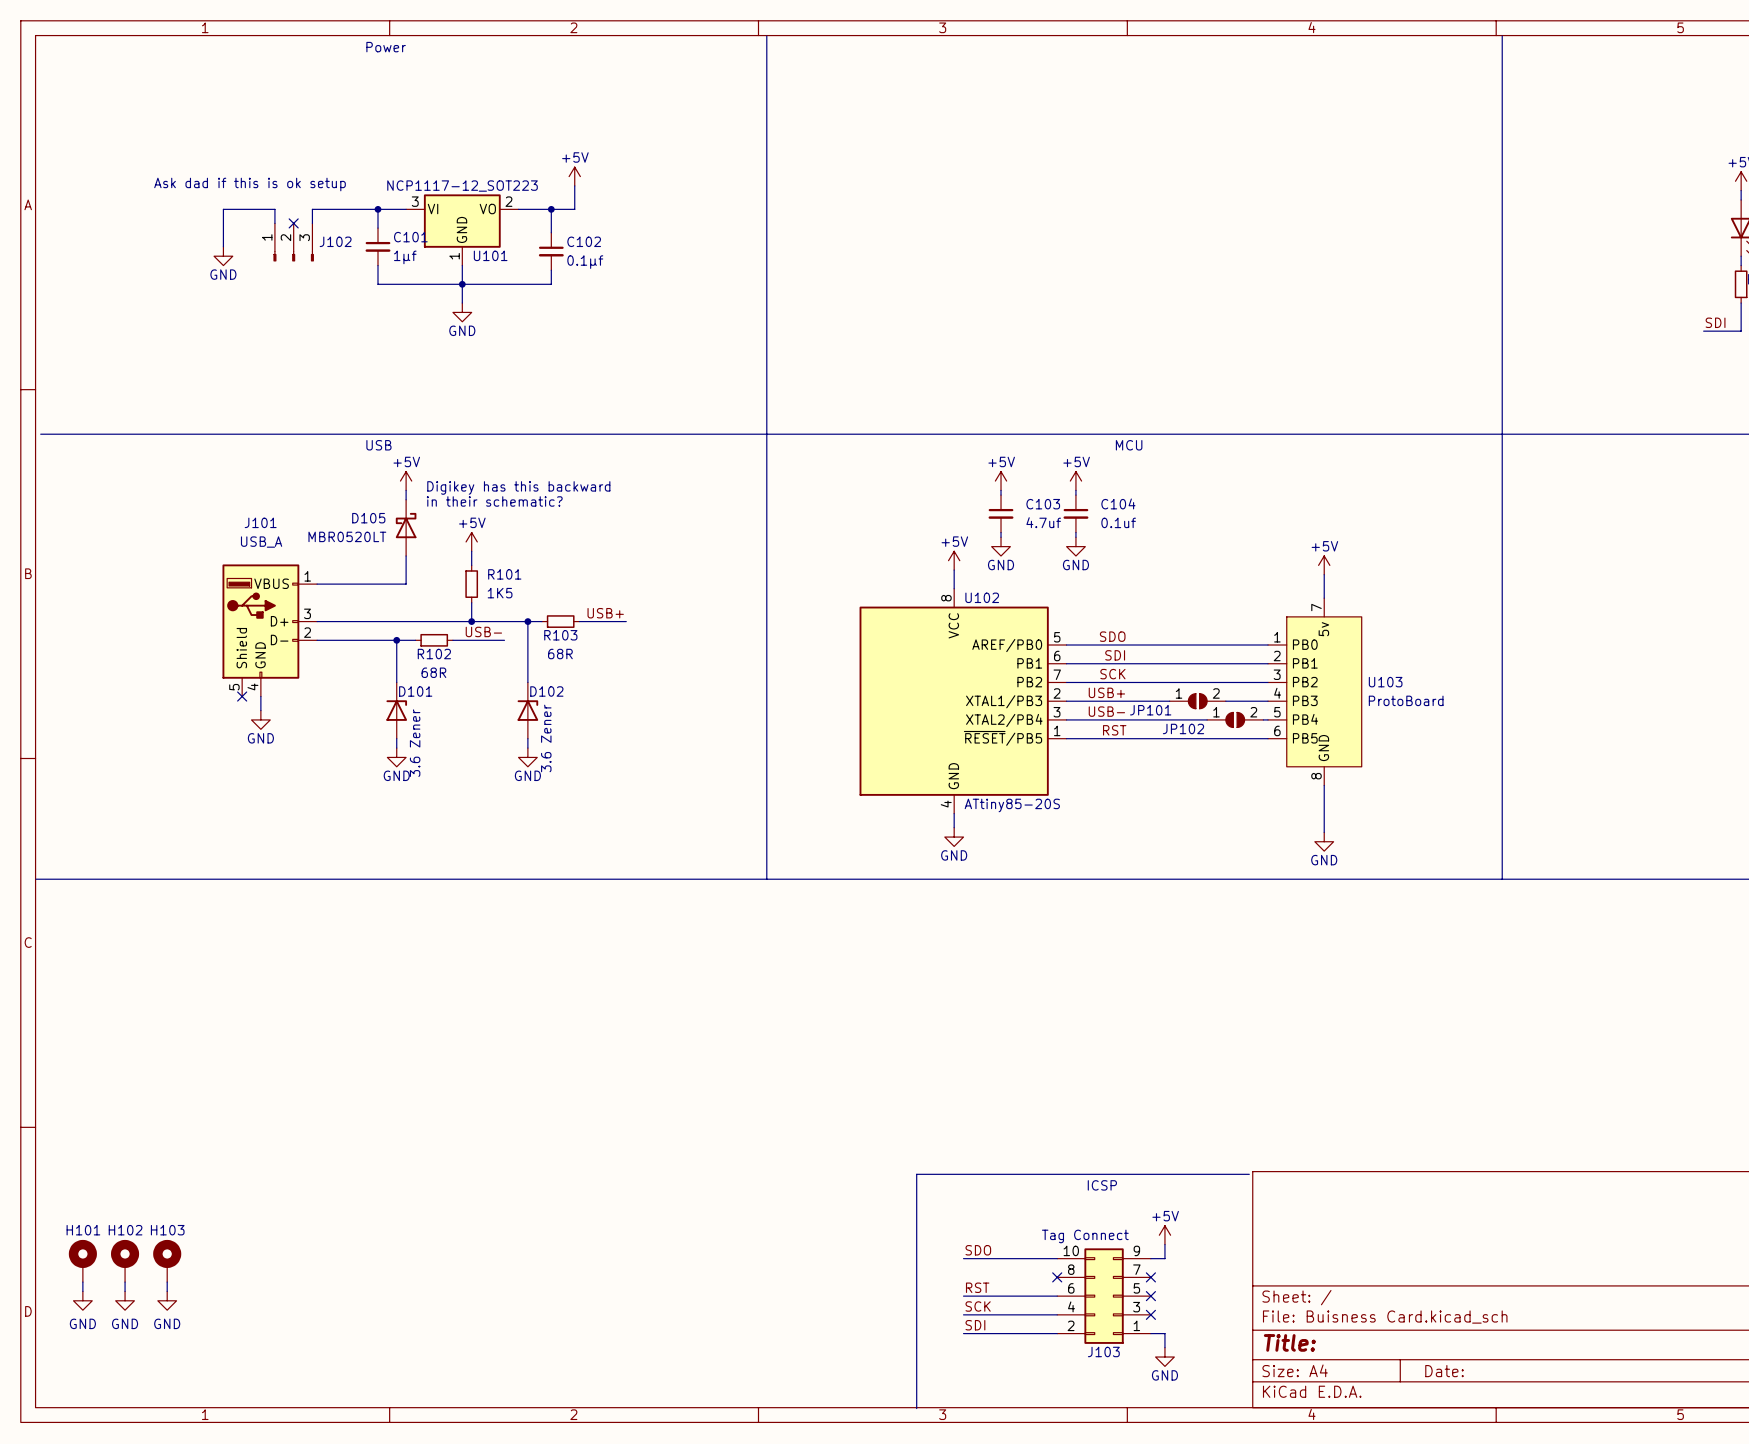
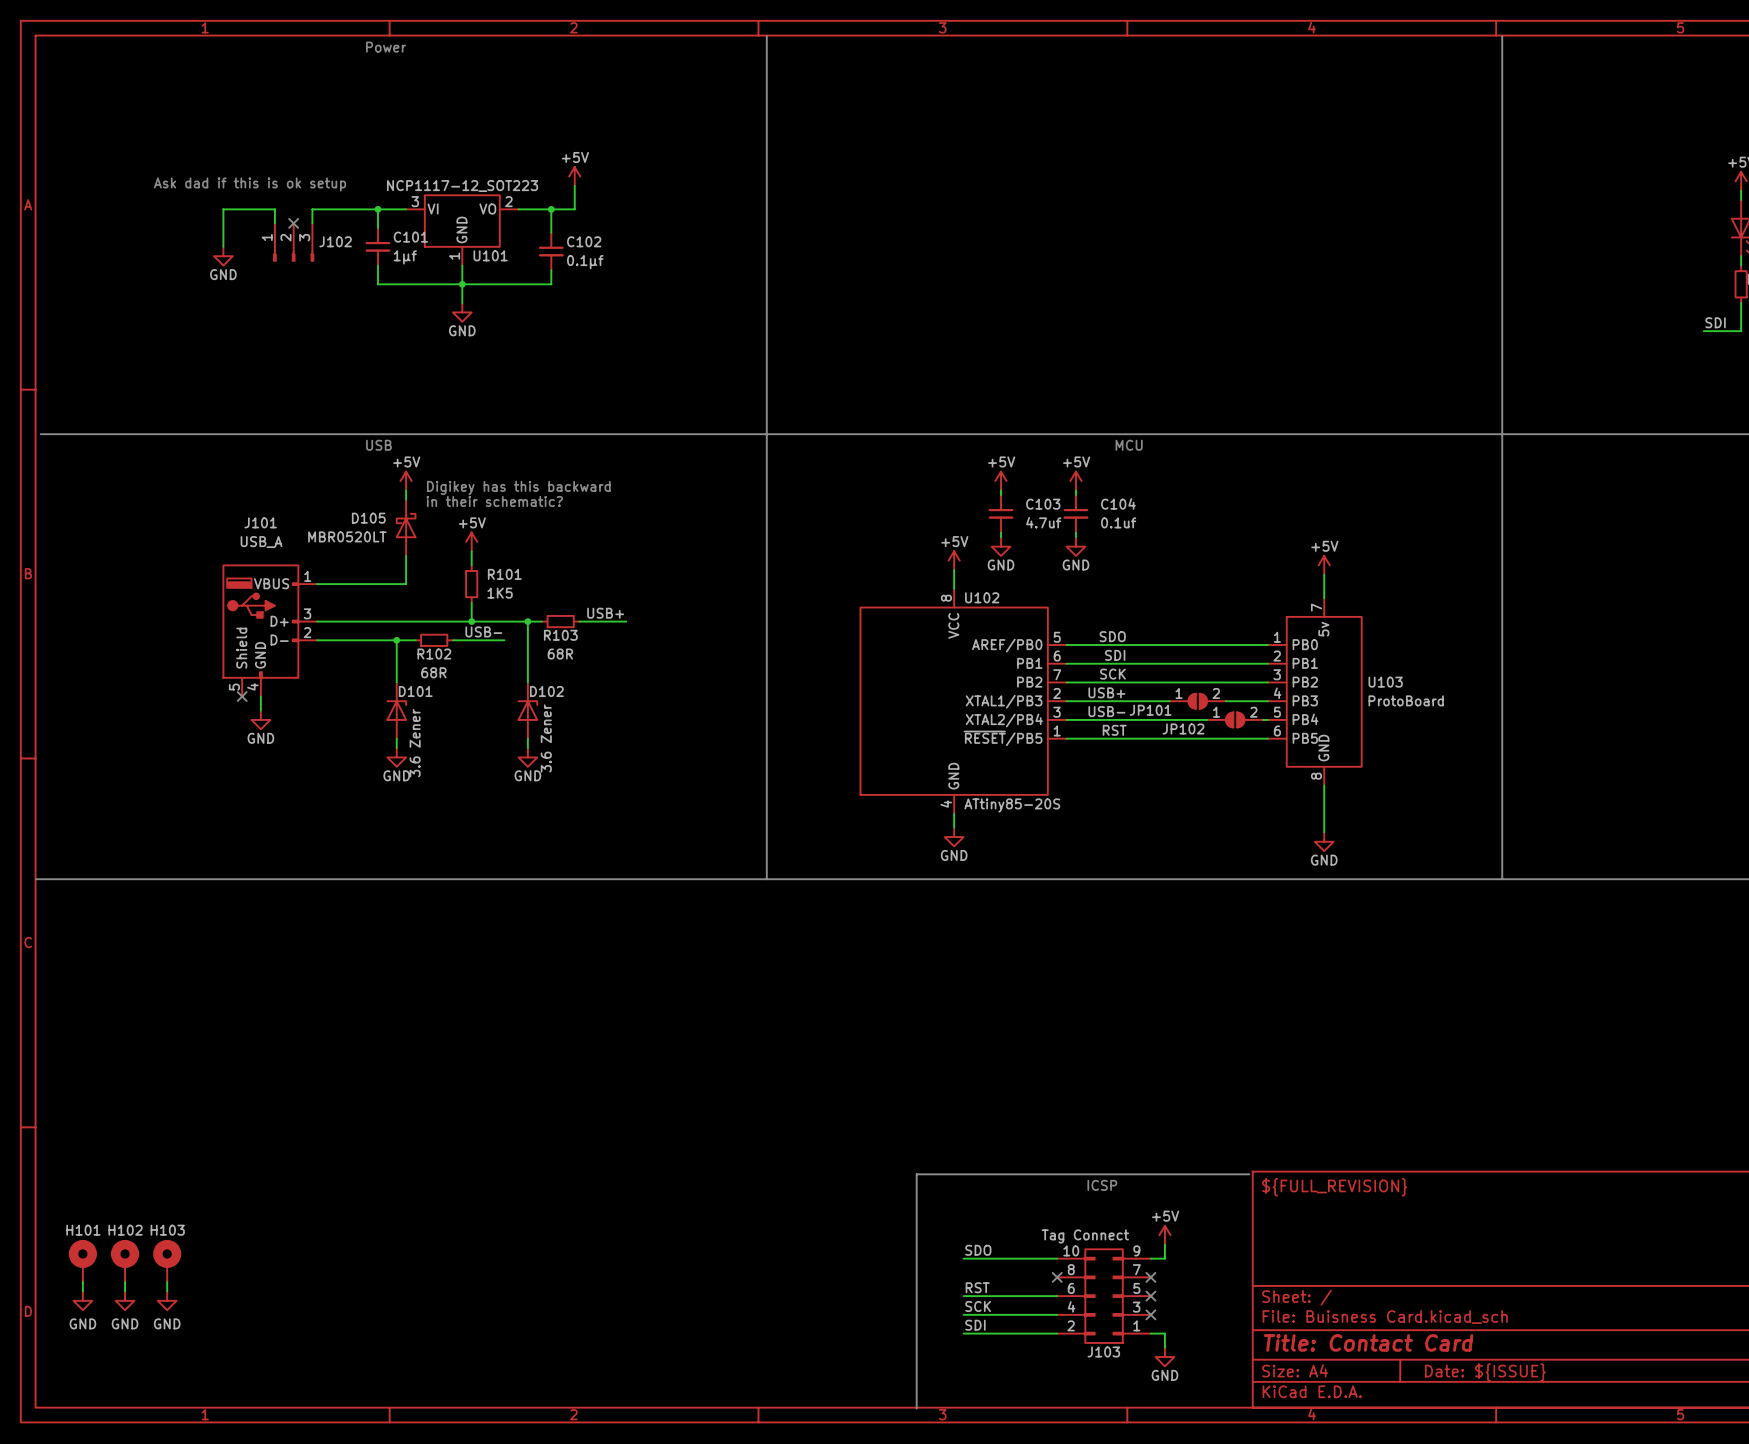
title block: none -> ${FULL_REVISION} (1334, 1187)
title block: Title: (1289, 1342) -> Title: Contact Card (1368, 1342)
title block: Date: (1444, 1371) -> Date: ${ISSUE} (1485, 1372)

